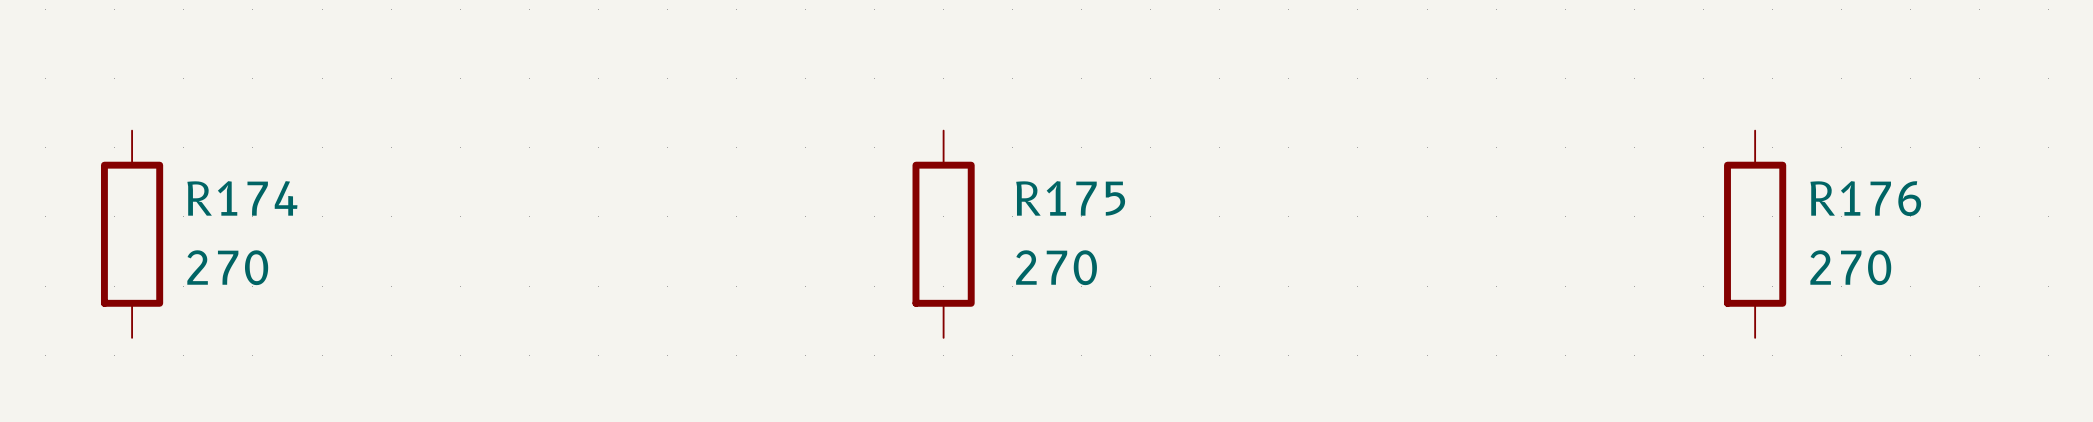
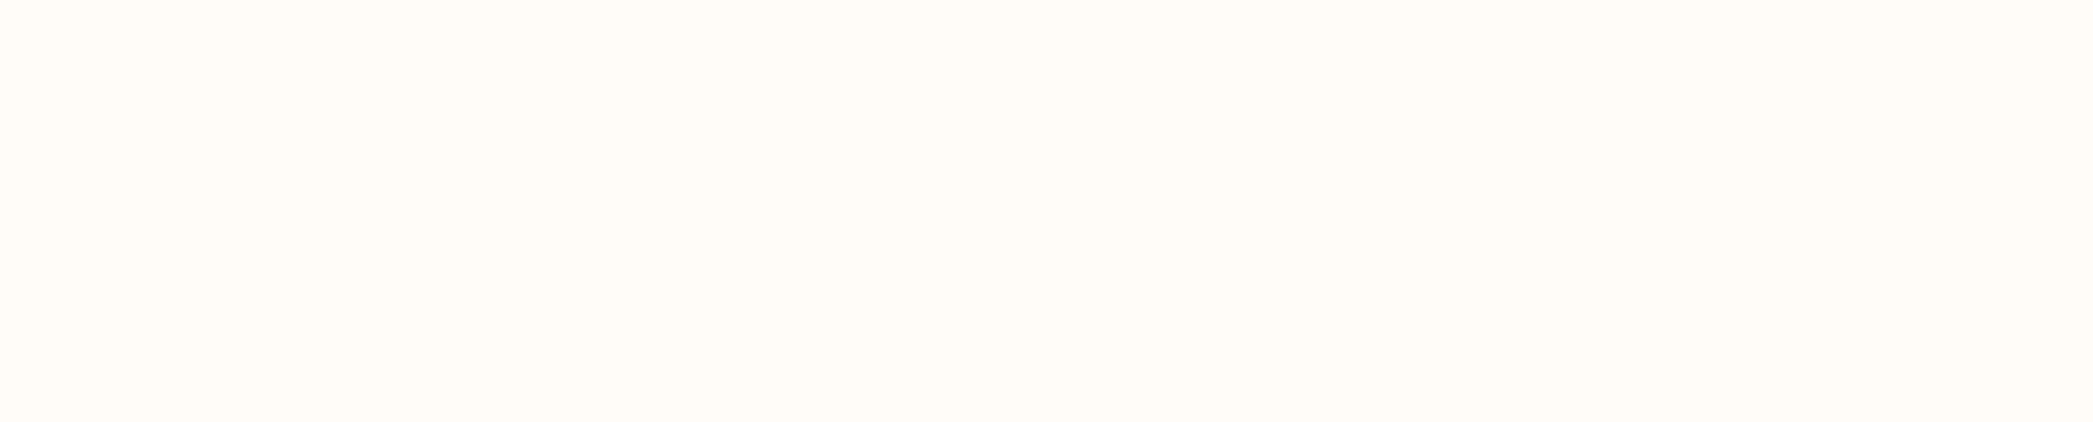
R174: 270 (132, 234) -> none
R175: 270 (943, 234) -> none
R176: 270 (1755, 234) -> none

